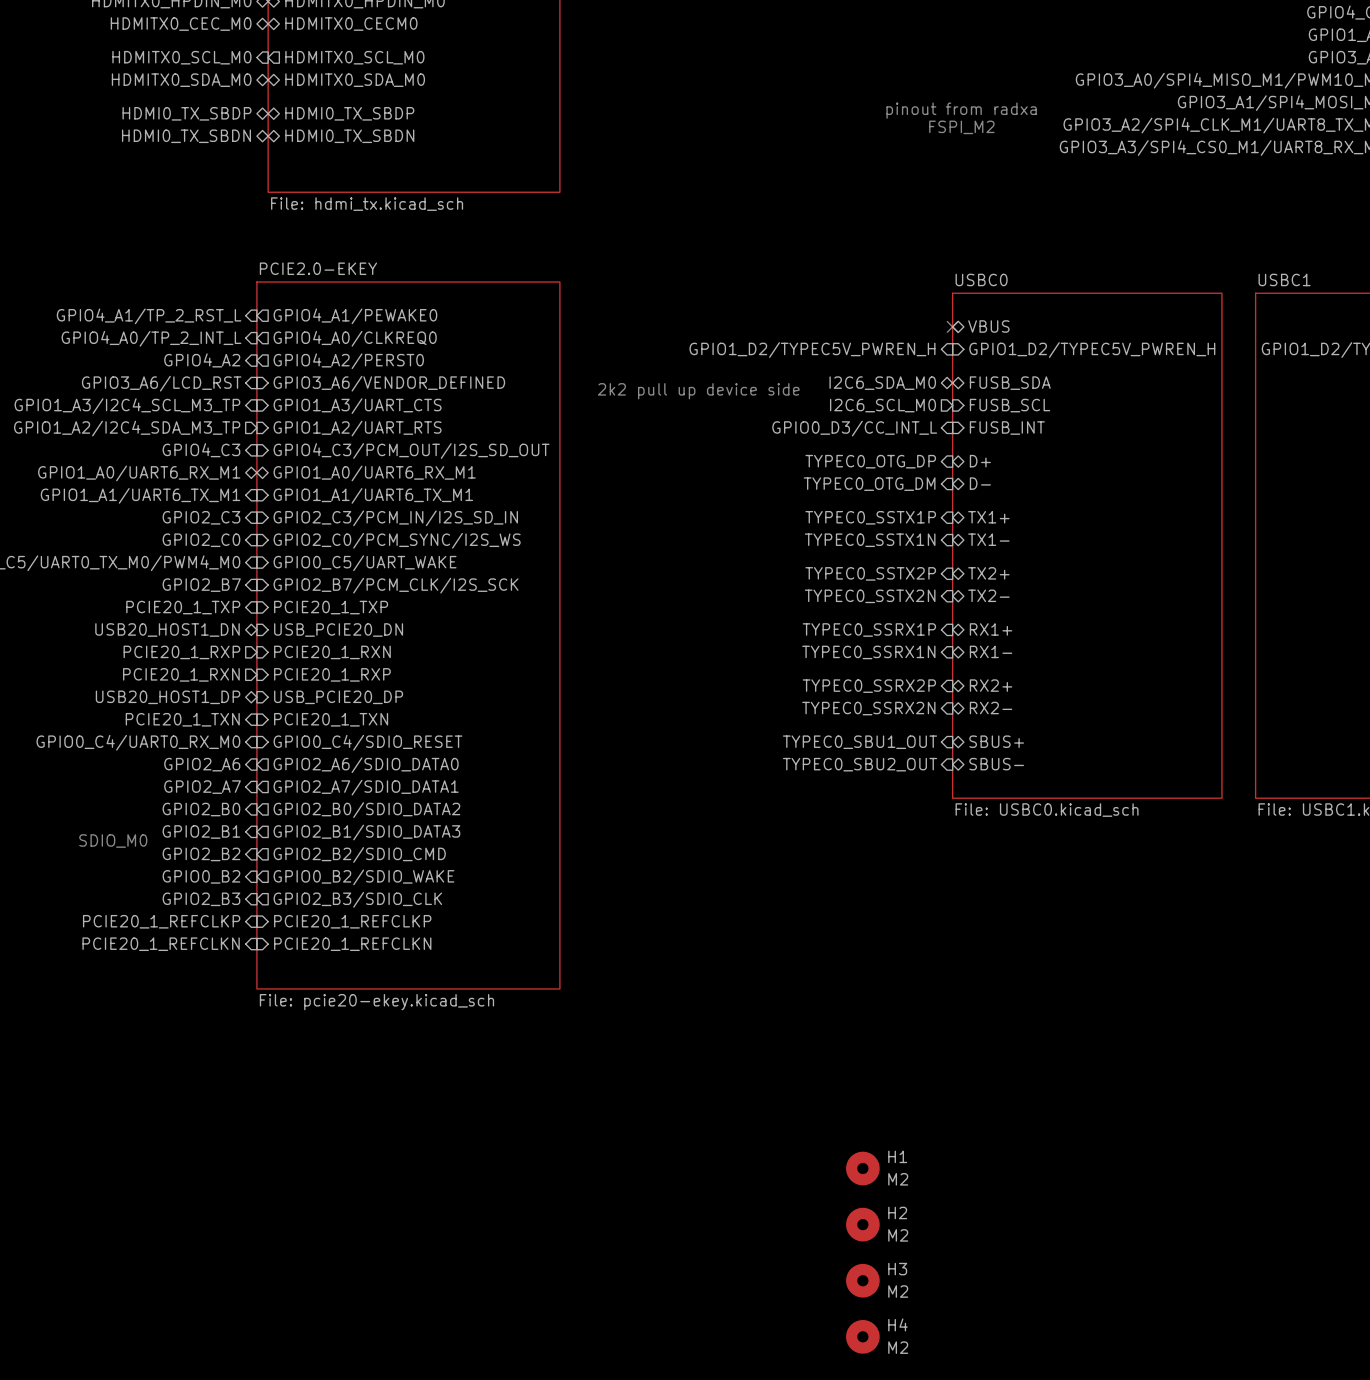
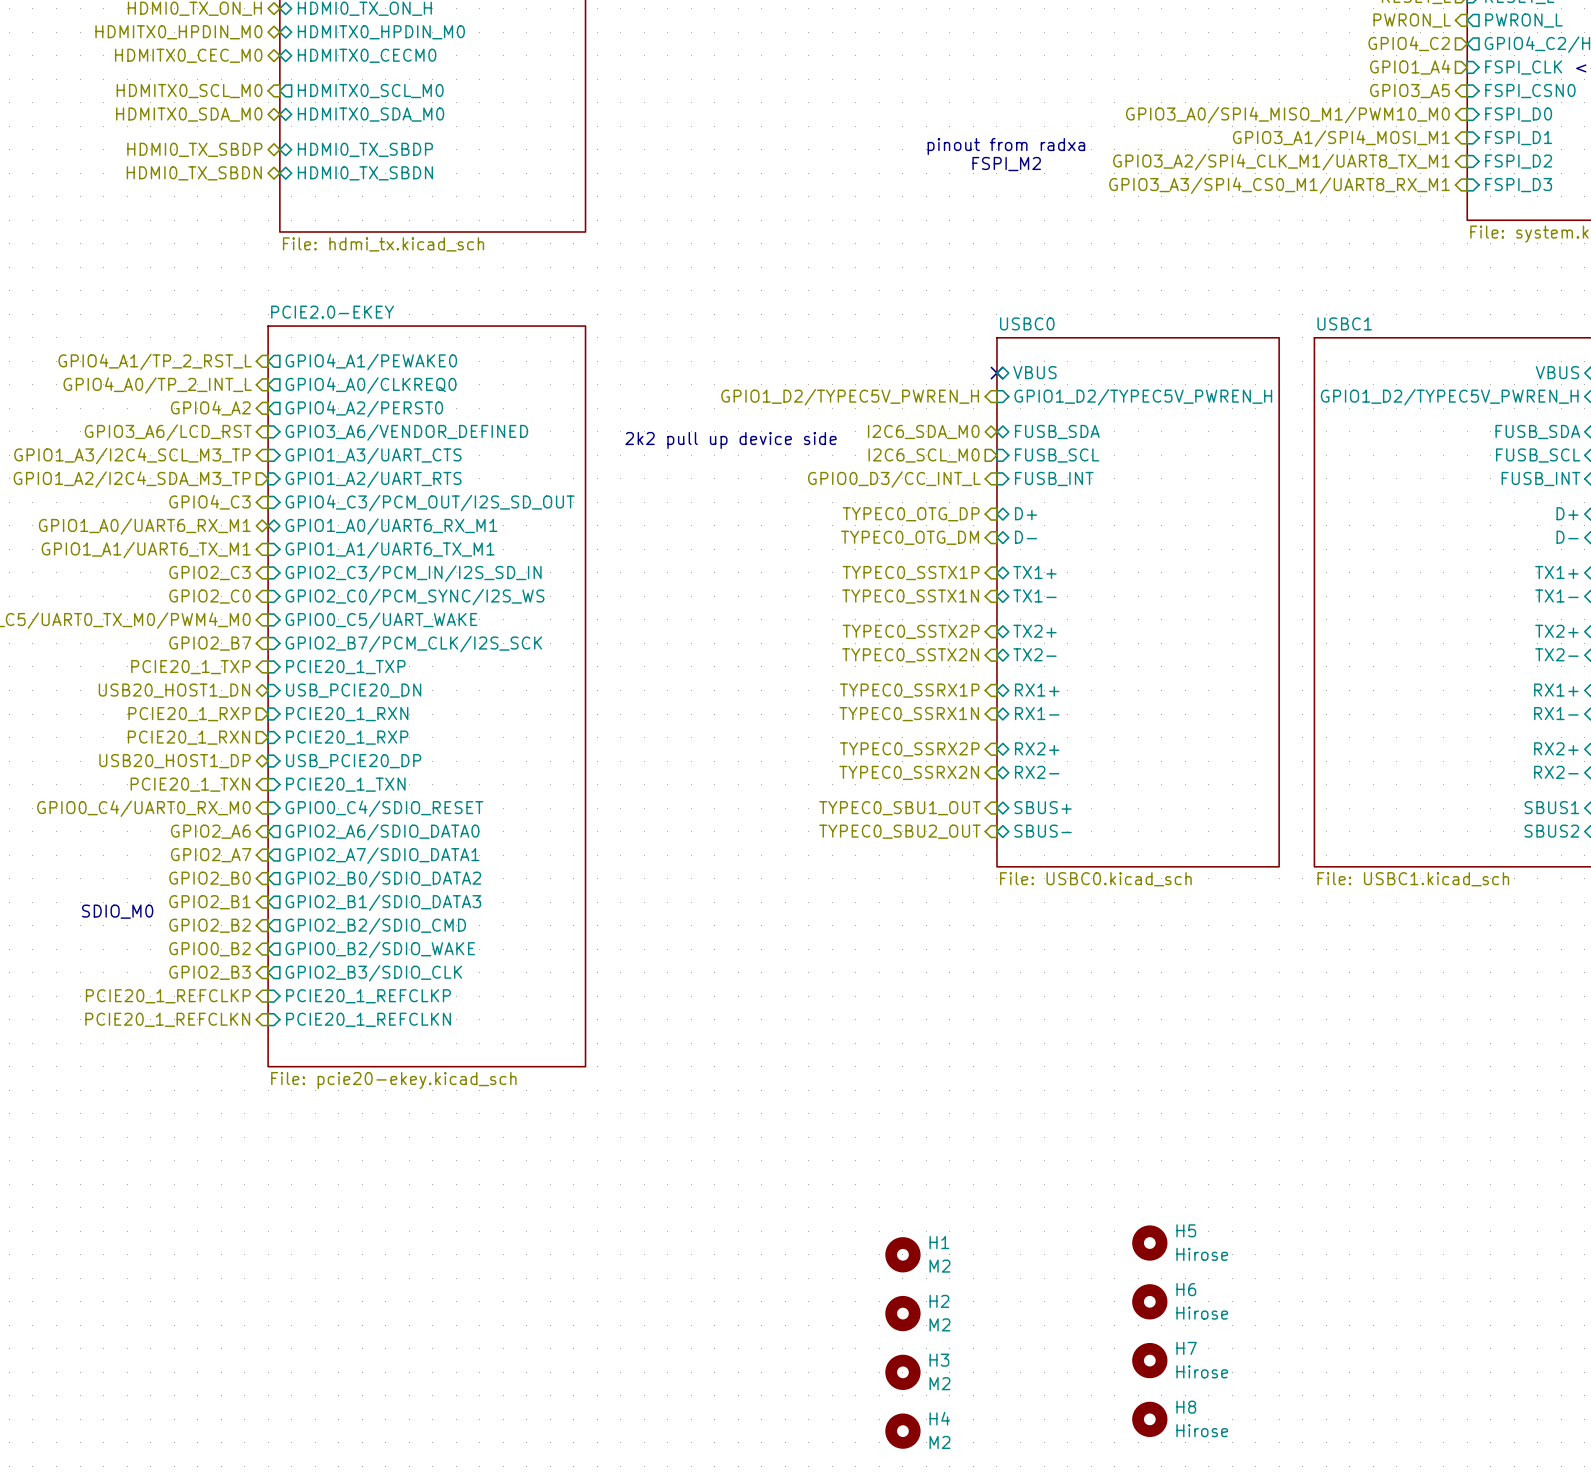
H5: none -> Hirose (1149, 1243)
H6: none -> Hirose (1149, 1301)
H7: none -> Hirose (1149, 1360)
H8: none -> Hirose (1149, 1419)

